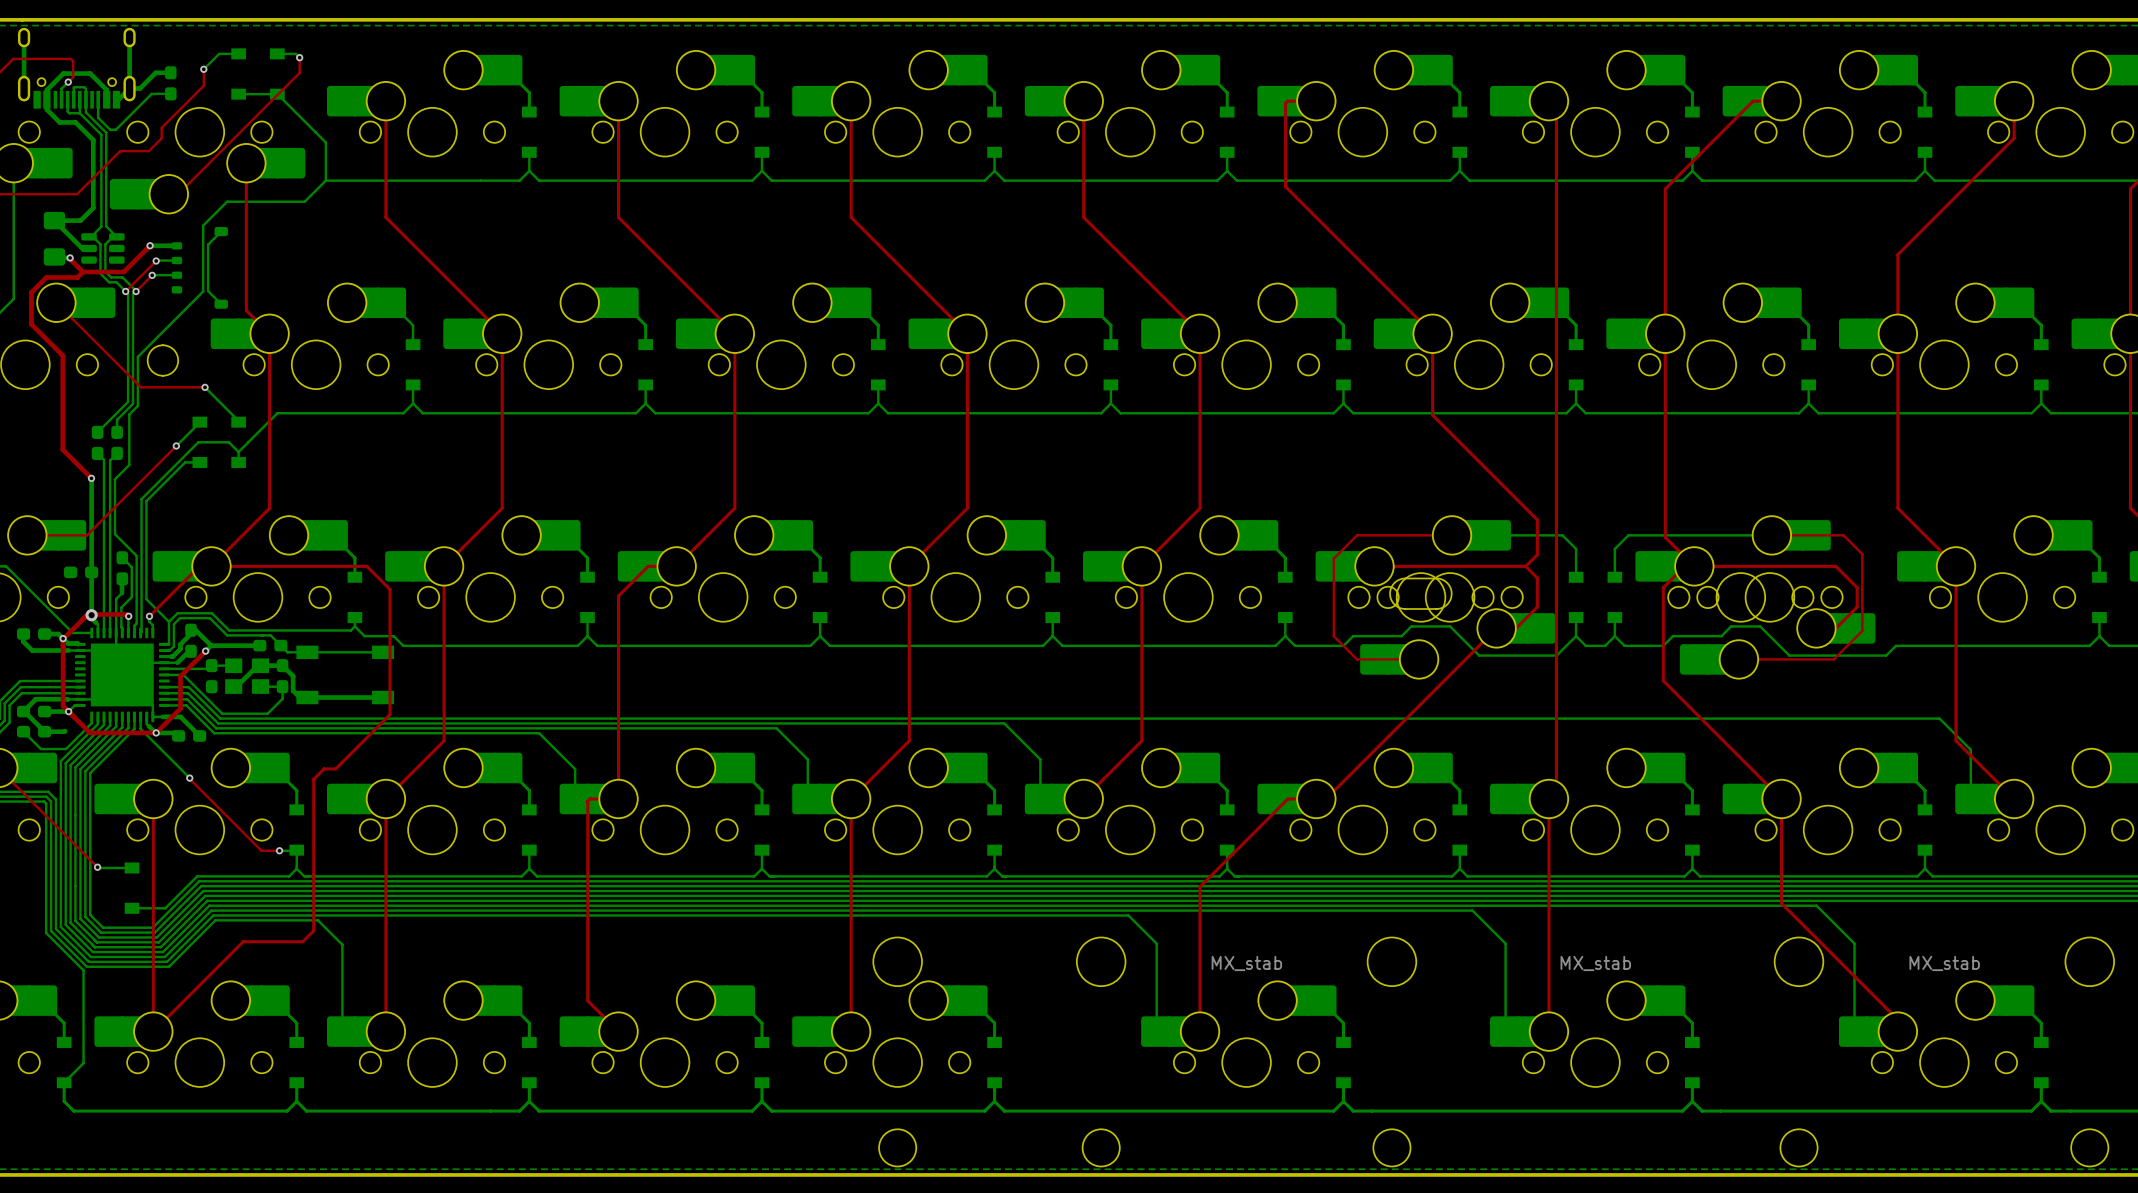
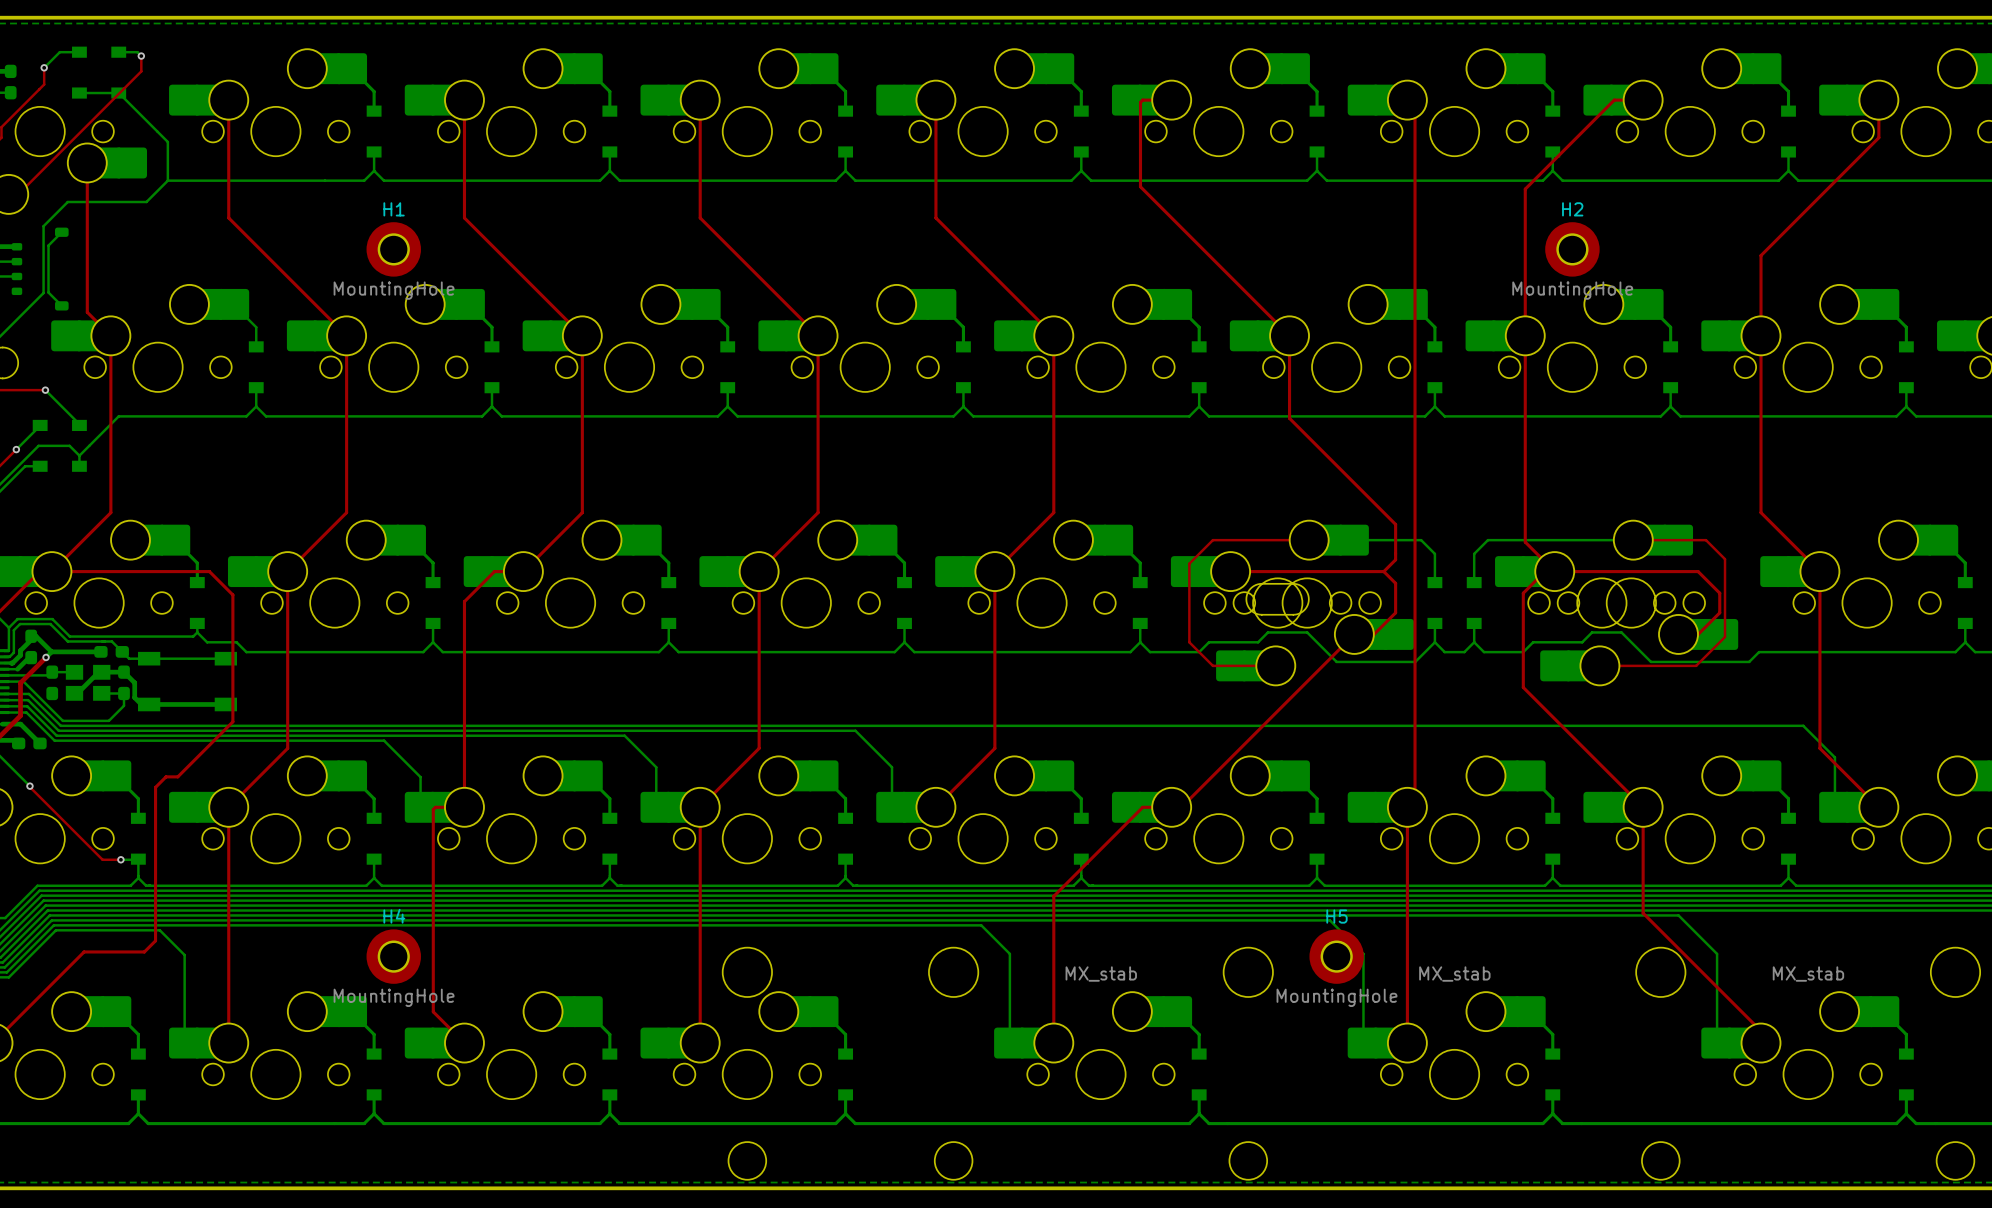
H1: none -> MountingHole (393, 249)
H2: none -> MountingHole (1572, 249)
H4: none -> MountingHole (393, 956)
H5: none -> MountingHole (1336, 956)

